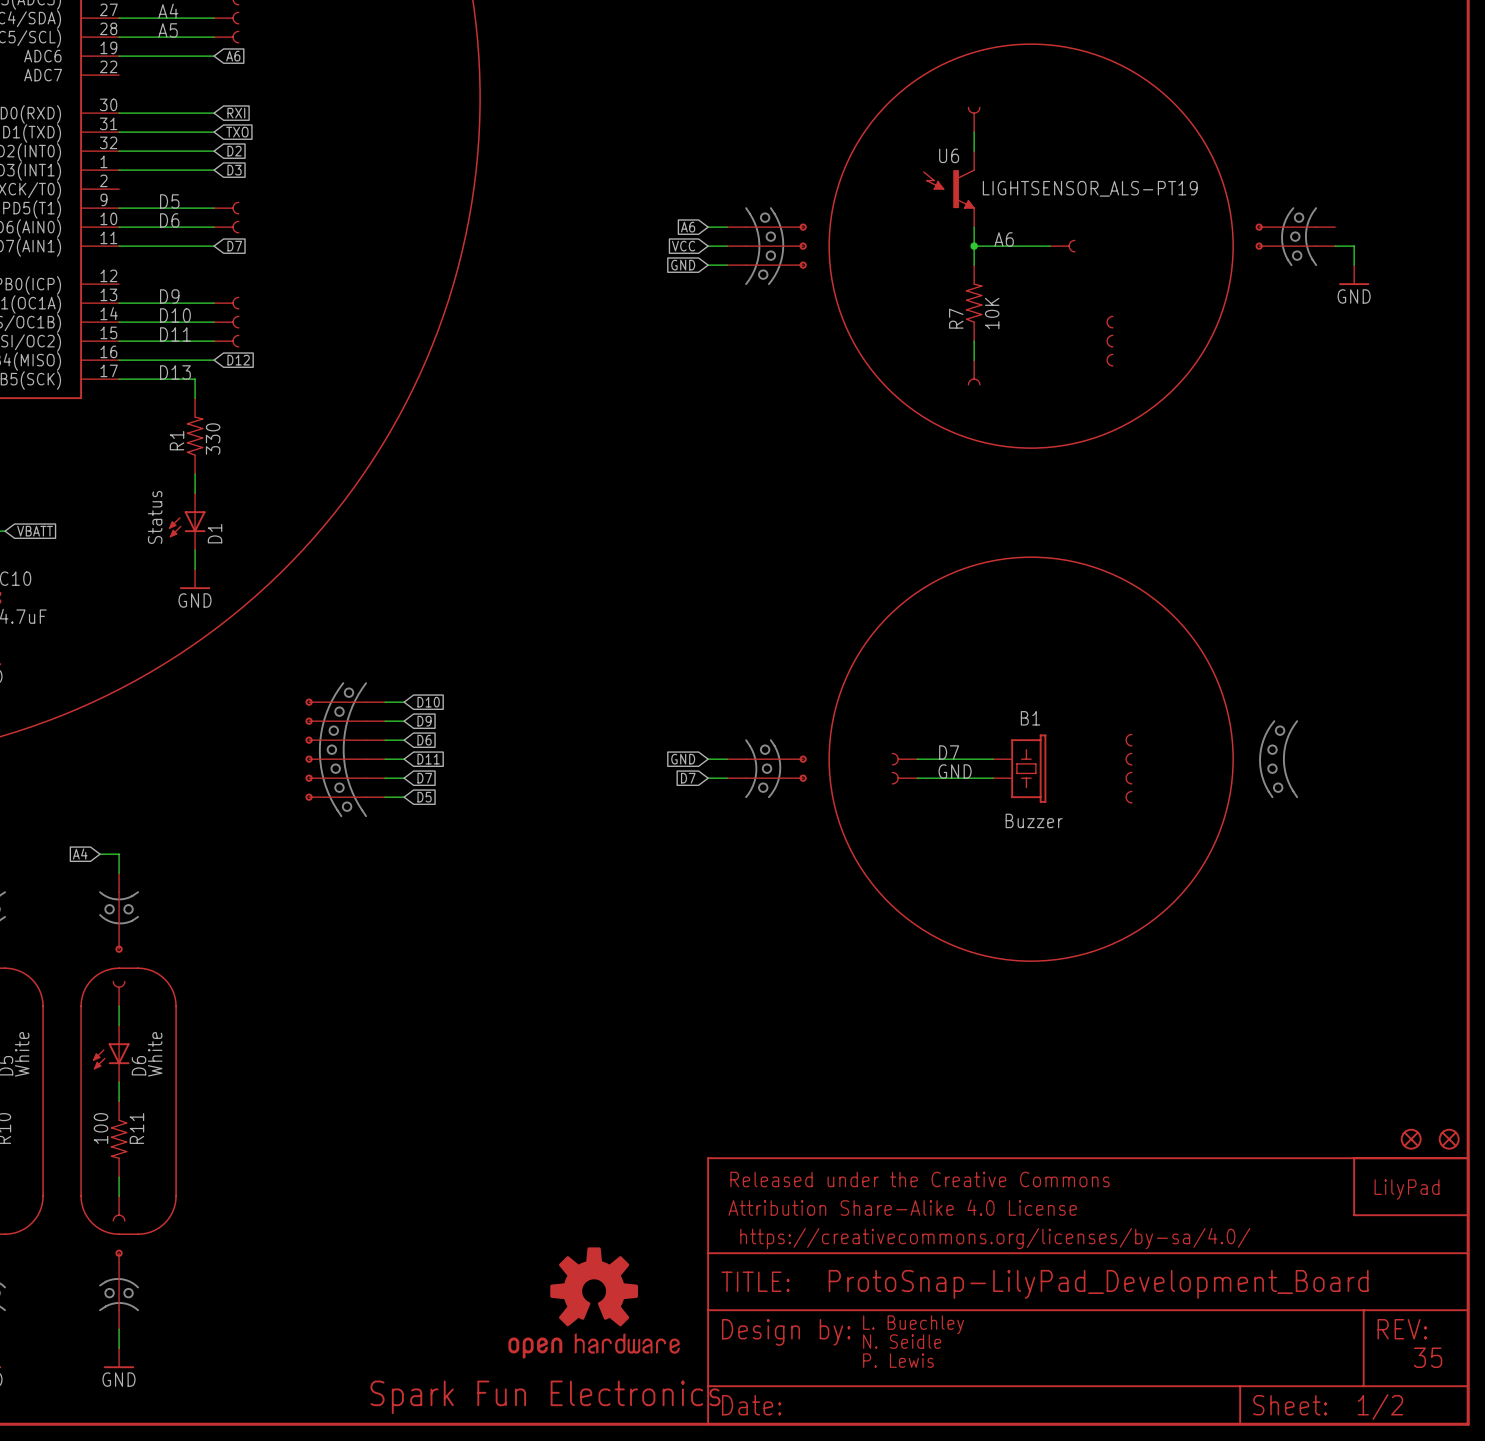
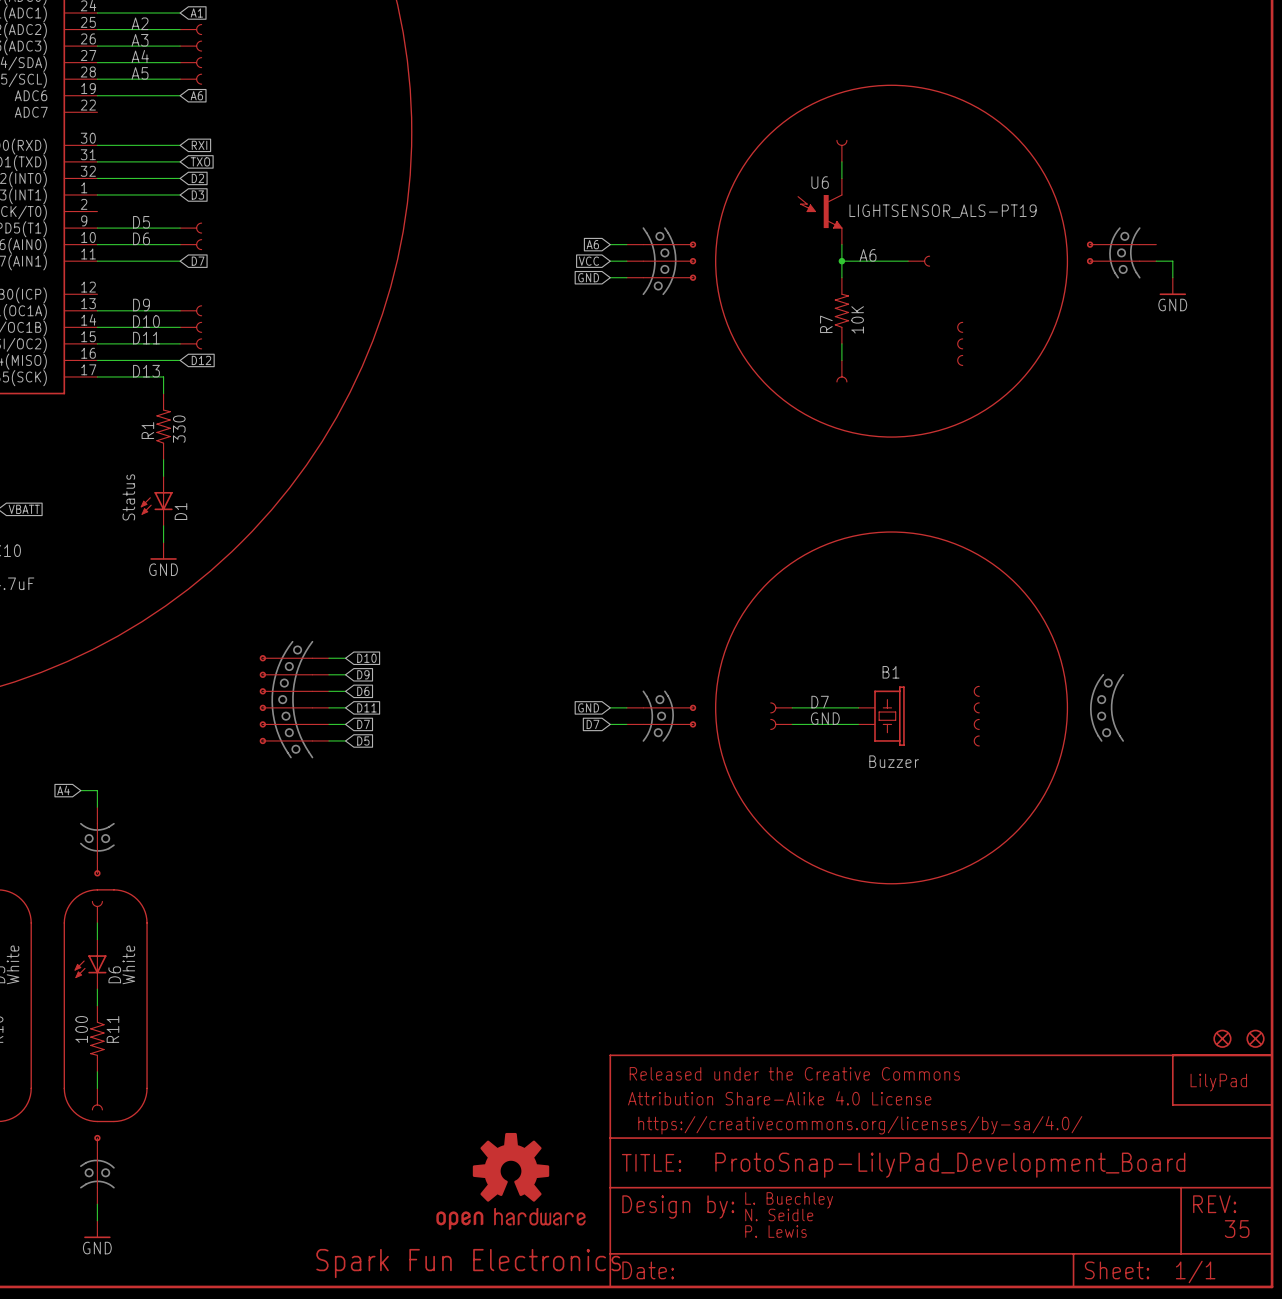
part text: 1/2 (1380, 1407) -> 1/1 (1195, 1271)

